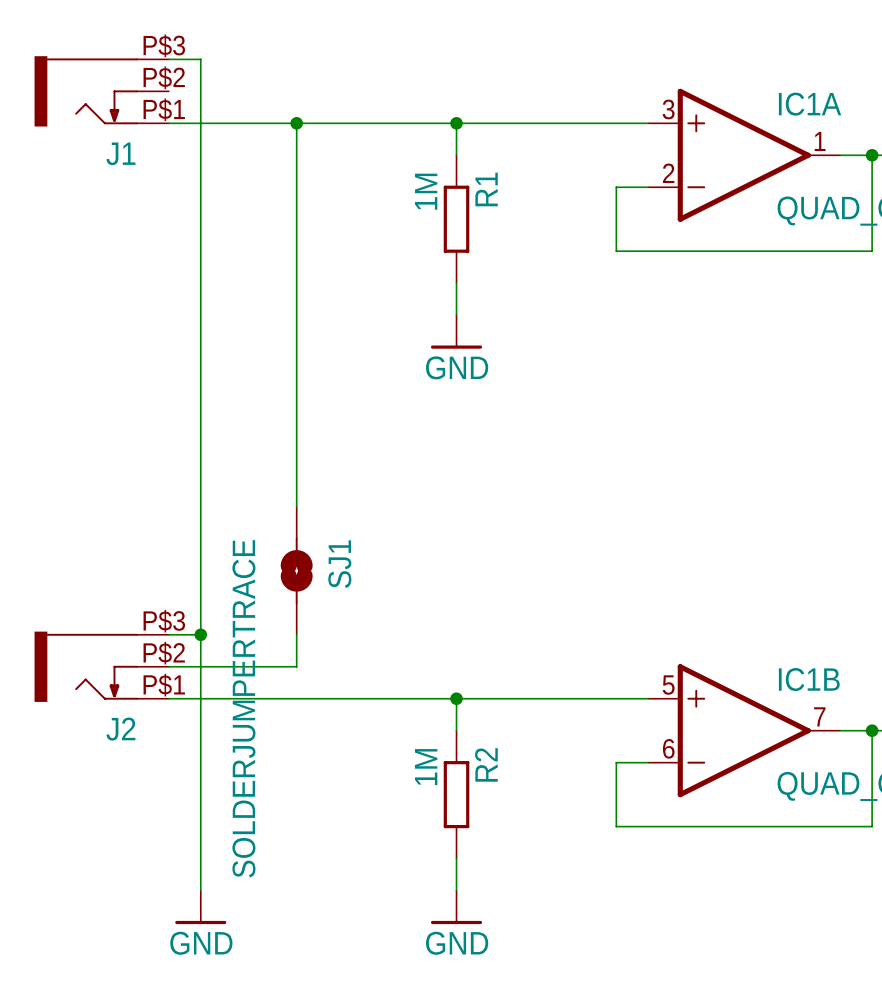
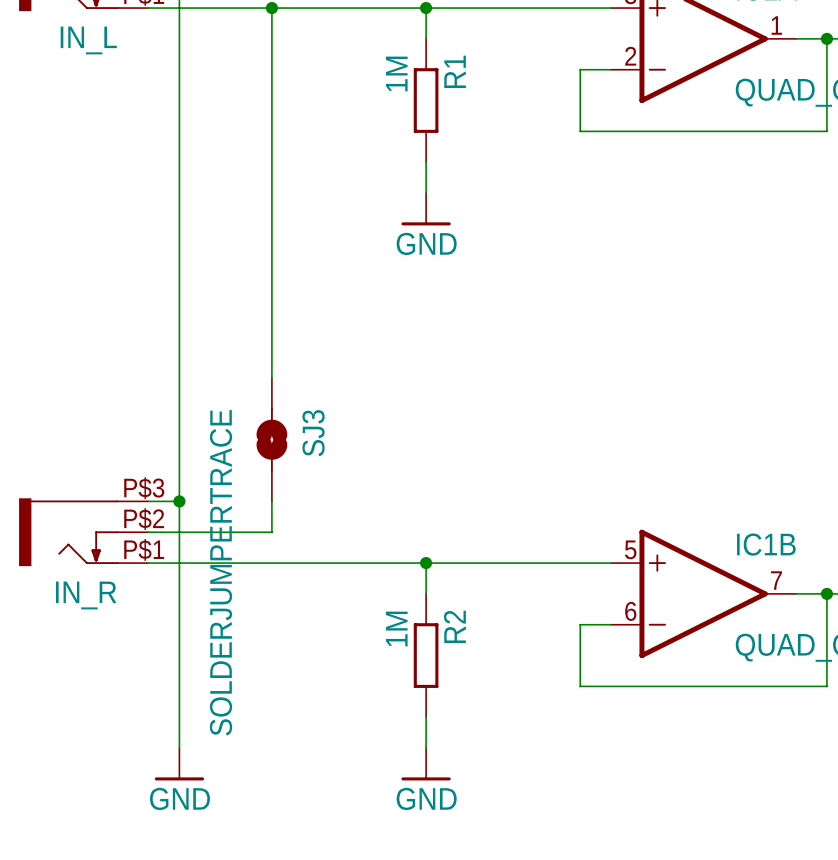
J1 name: J1 (120, 153) -> IN_L (88, 40)
SJ1 name: SJ1 (339, 564) -> SJ3 (313, 433)
J2 name: J2 (120, 729) -> IN_R (86, 595)

